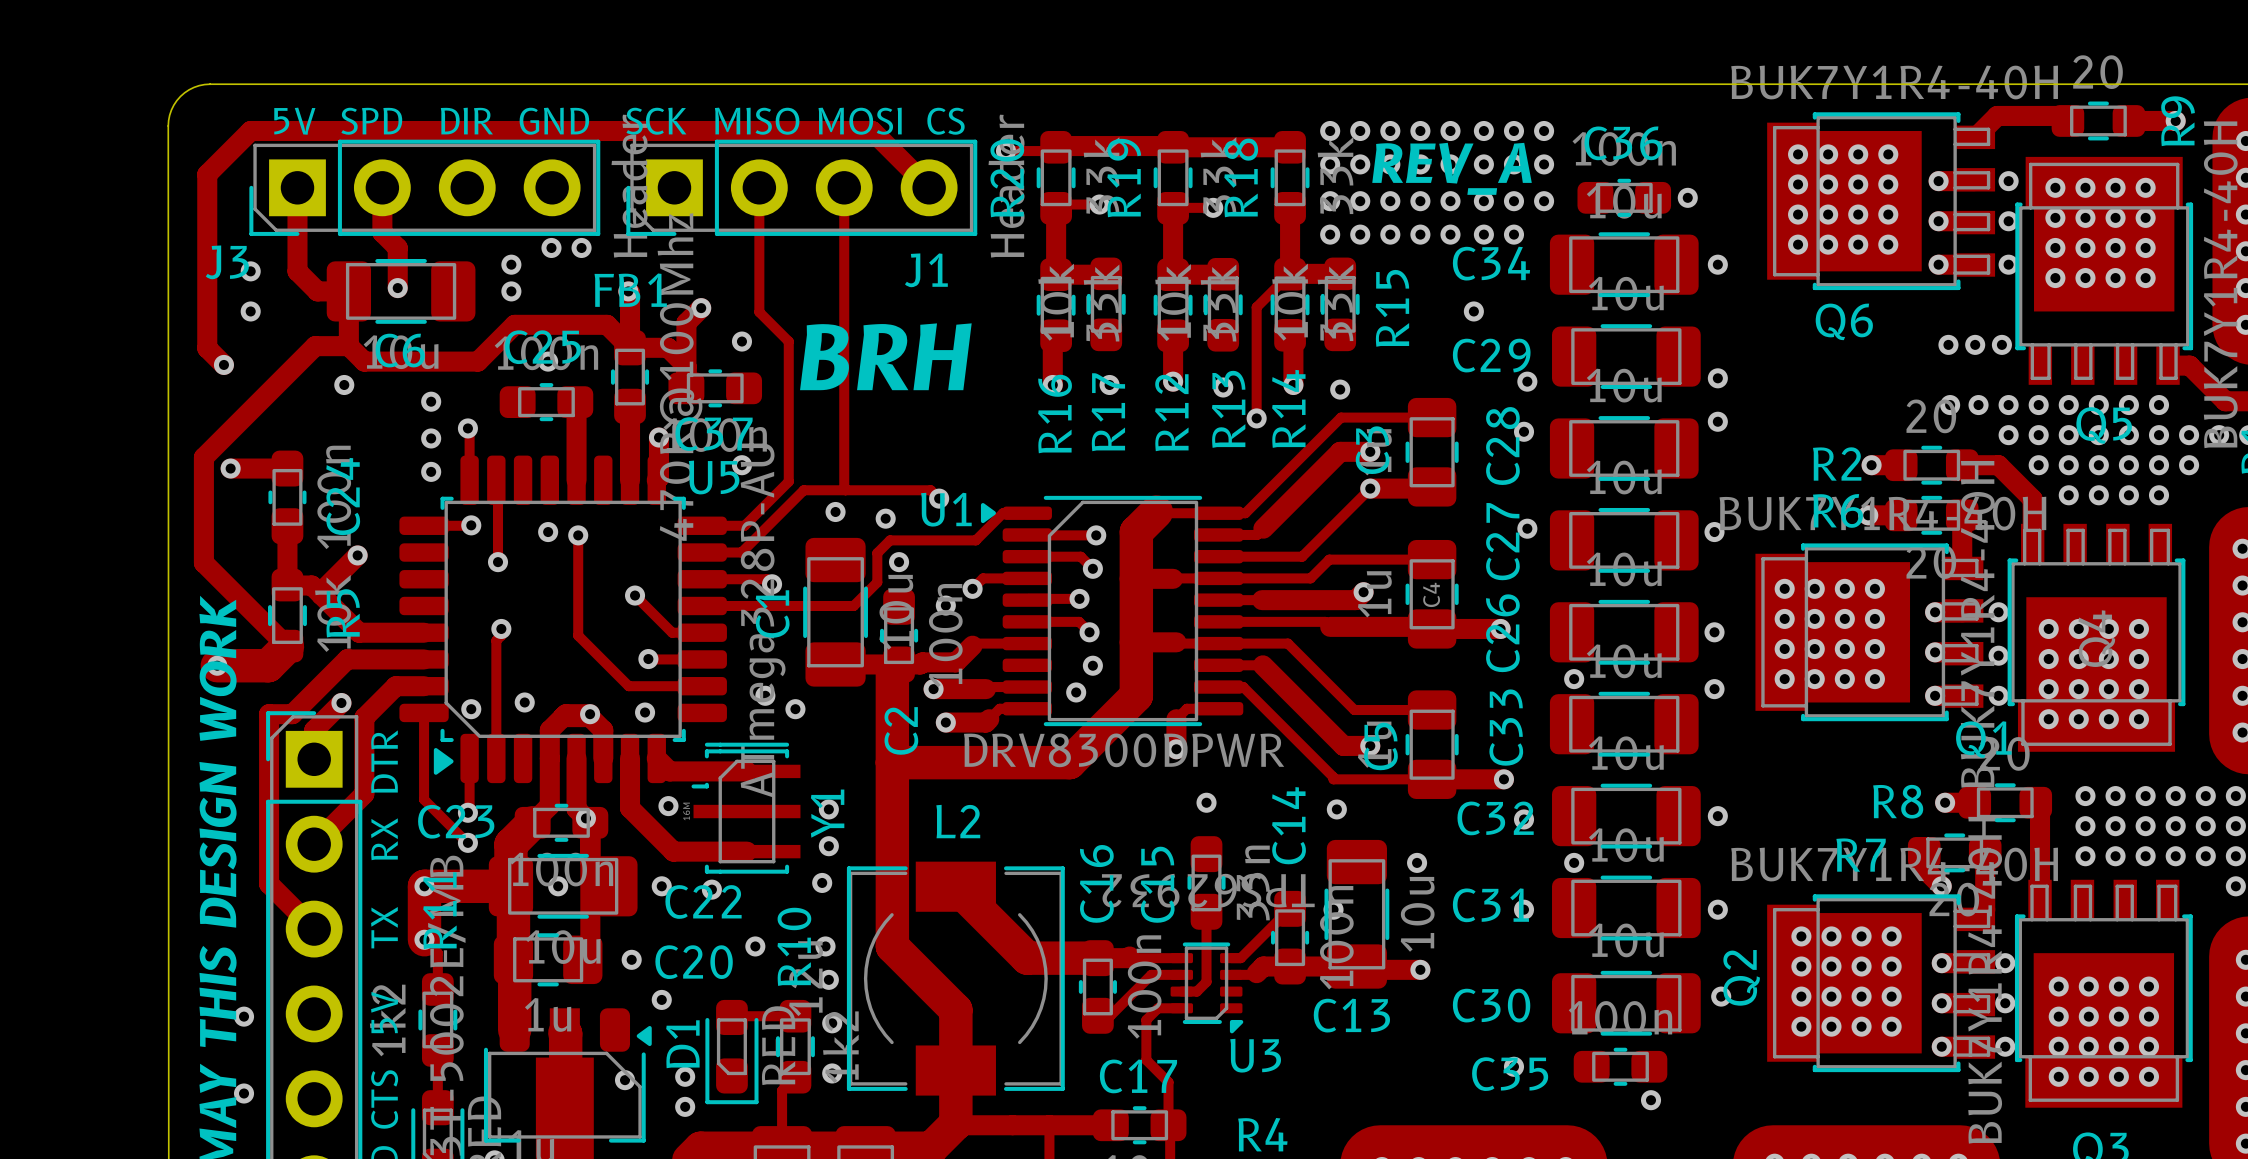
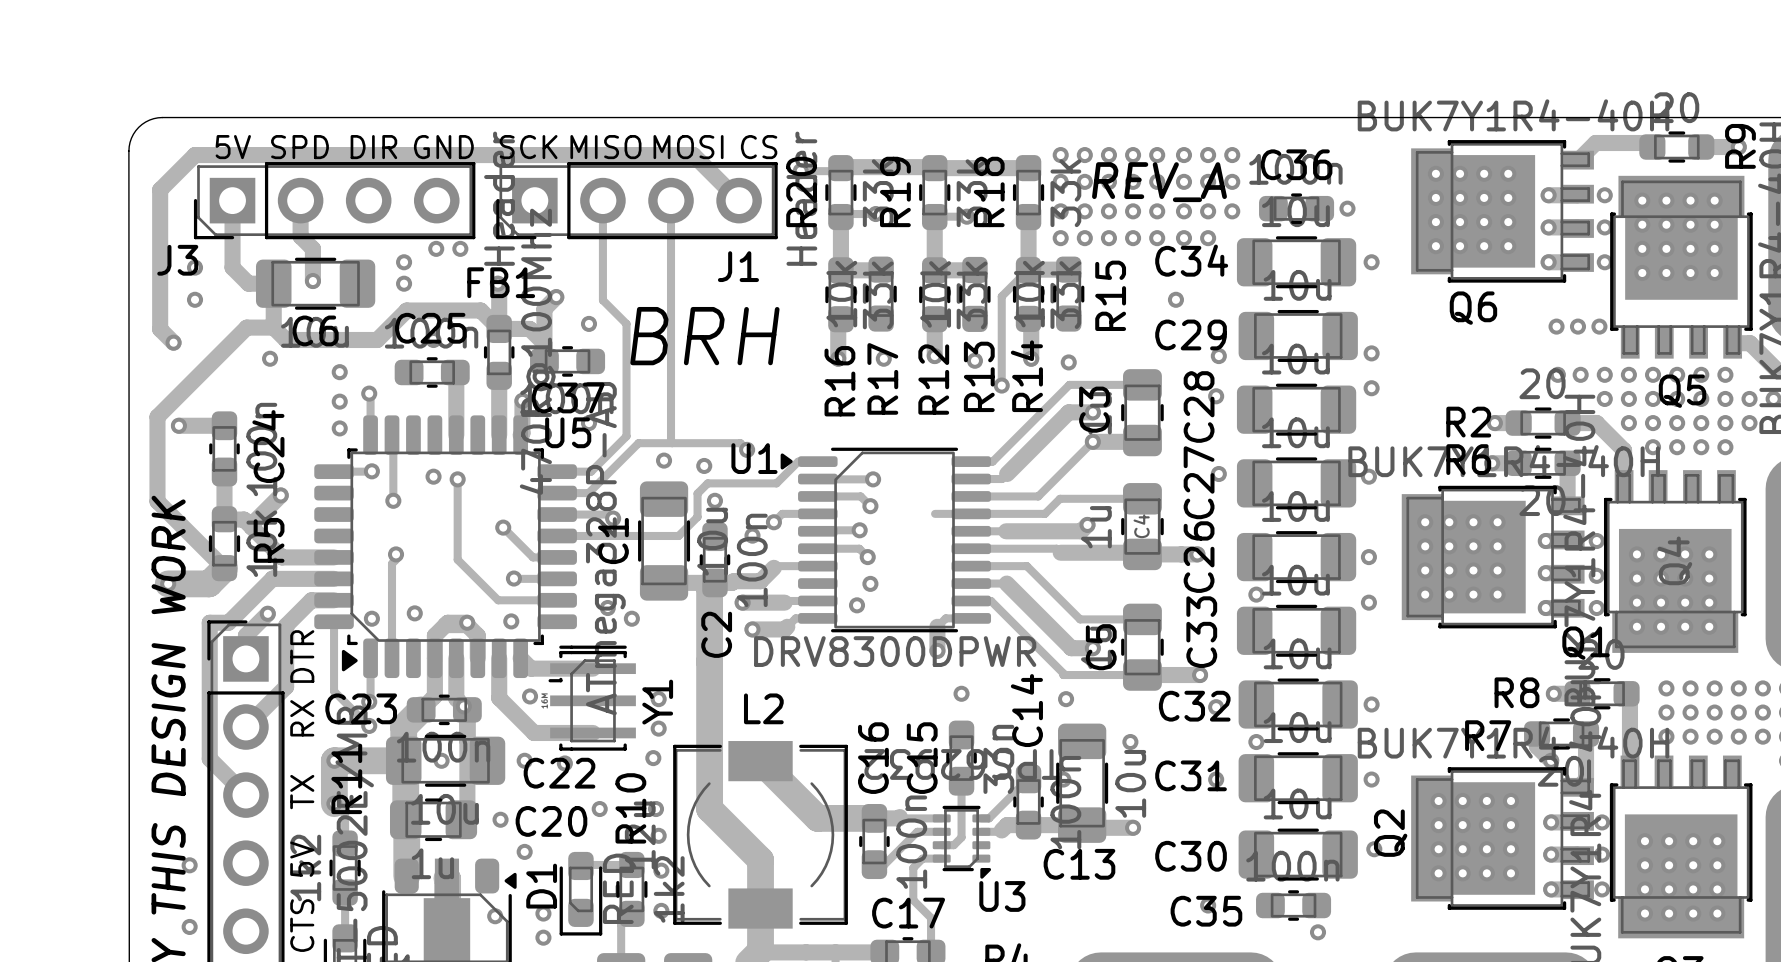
track: (1218, 513) (1156, 511) (1136, 532) (1136, 695) (1069, 762) (892, 762) -> none
track: (1136, 578) (1173, 578) -> none
track: (1136, 642) (1218, 643) -> none

